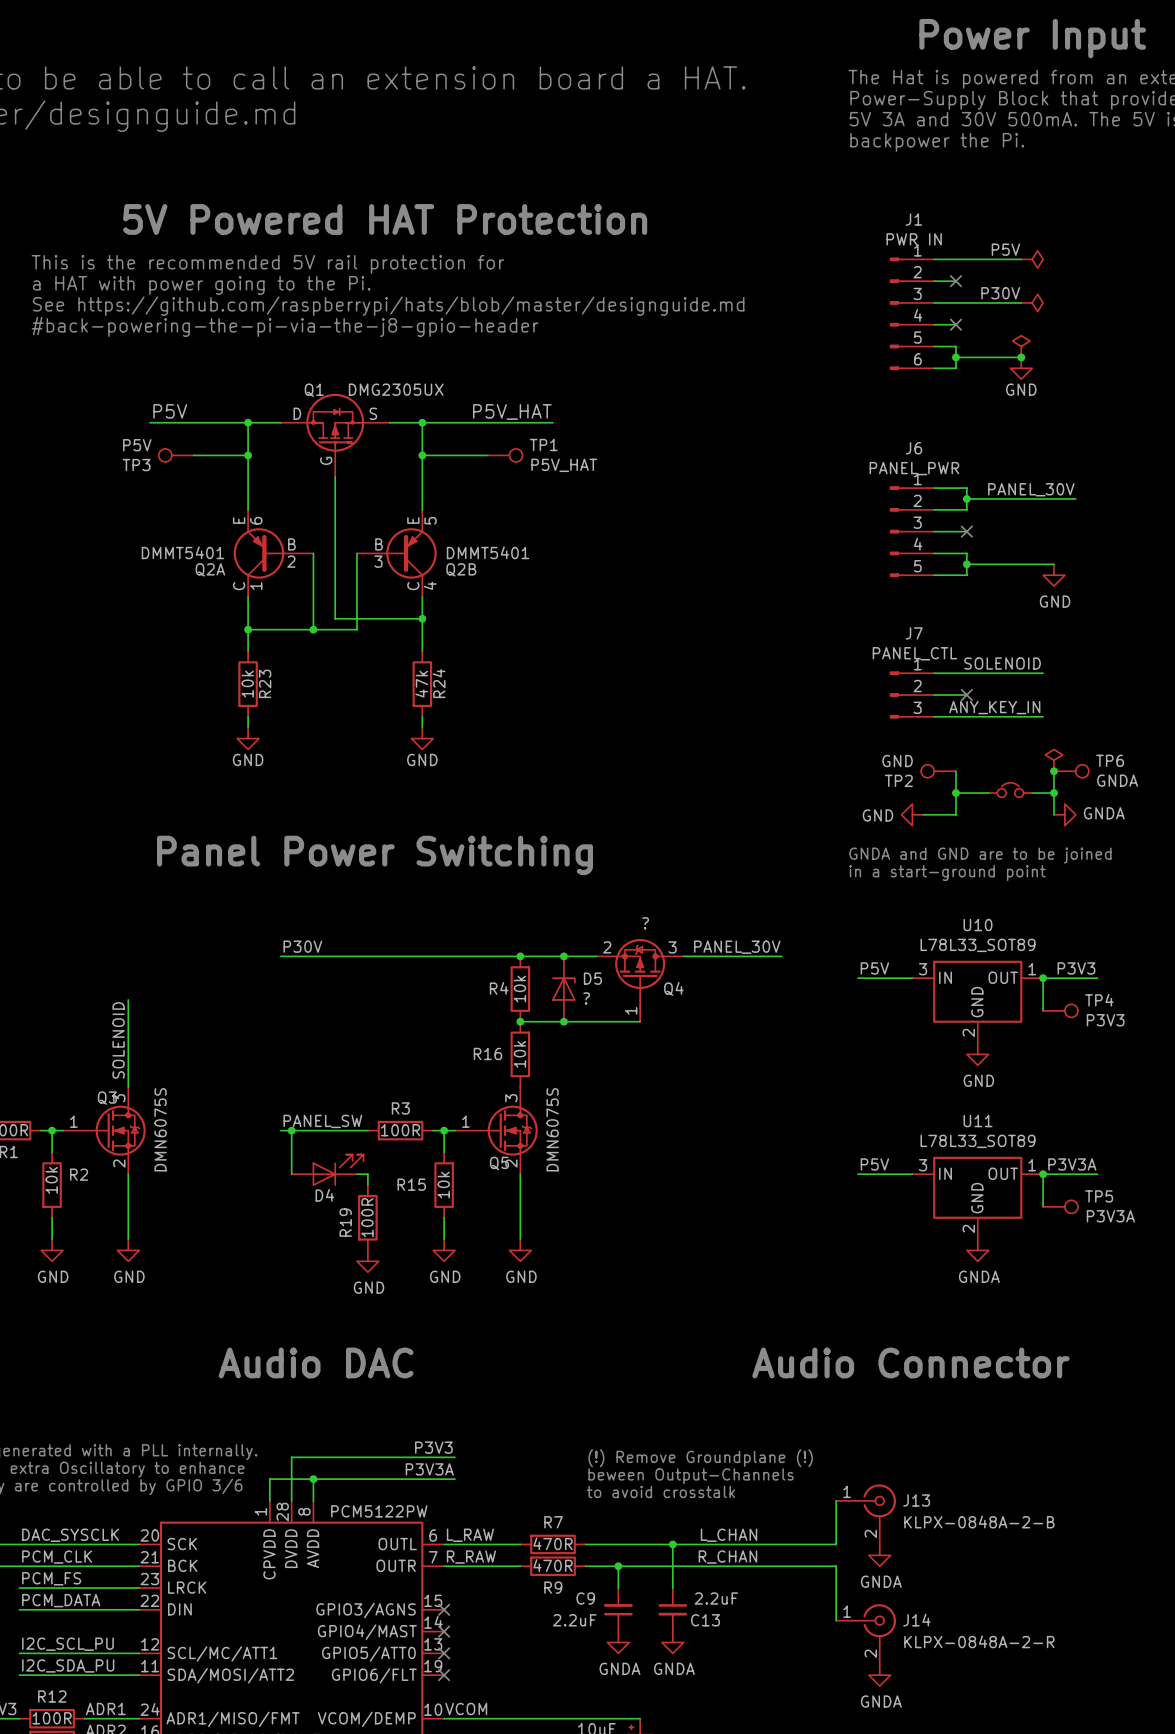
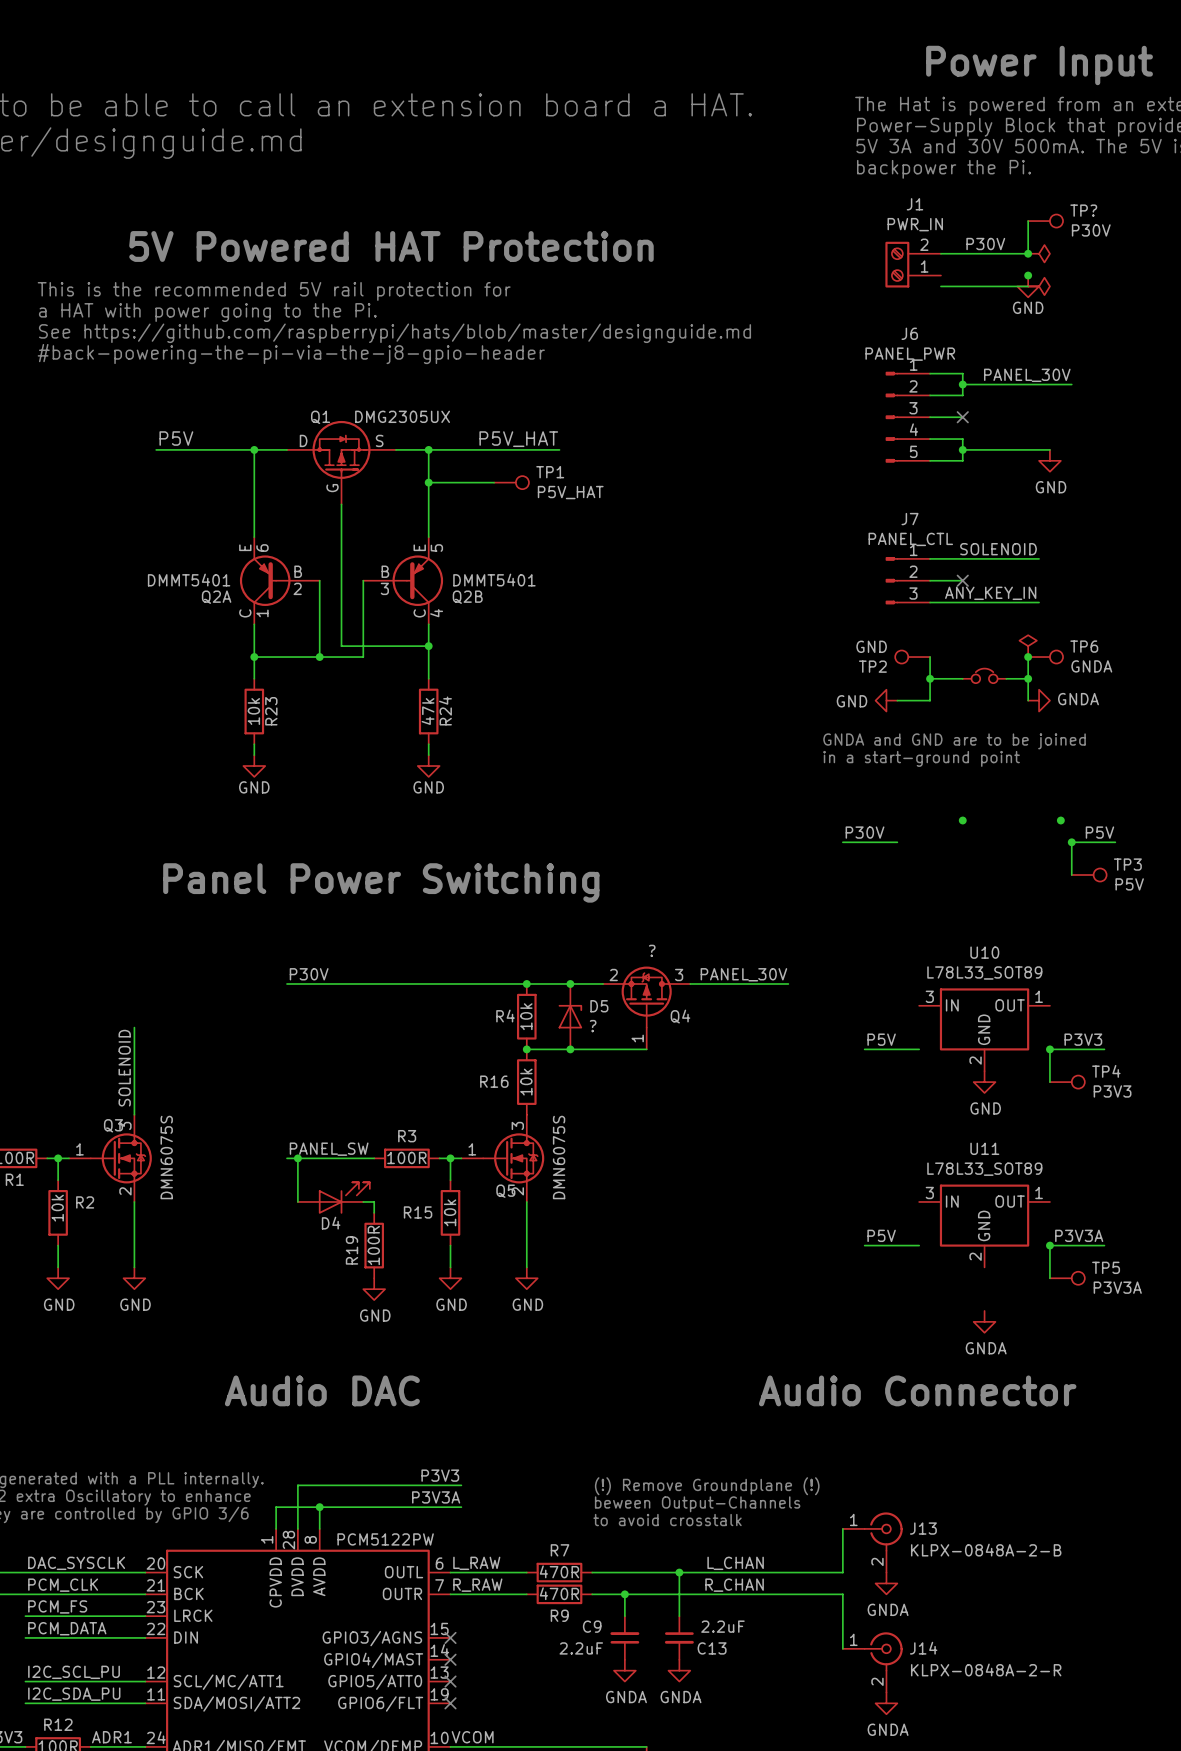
wire: none -> (1028, 221) (1028, 253) (940, 253)
TP?: none -> P30V (1045, 221)
J1 name position: J1 (913, 219) -> J1 (914, 204)
junction: none -> (1028, 253)
power symbol: none -> (1039, 253)
J1 value: PWR IN (914, 239) -> PWR_IN (915, 224)
junction: none -> (1028, 275)
label: P5V (1005, 249) -> none
J1 symbol: [889, 257, 935, 371] -> [885, 241, 941, 288]
power symbol: none -> GND (1028, 286)
wire: (934, 281) (955, 281) -> none
no-connect mark: (955, 281) -> none
label position: P30V (1000, 293) -> P30V (985, 244)
wire: (934, 302) (1021, 302) -> (962, 449) (1049, 449)
power symbol: (1032, 302) -> none
wire: (934, 324) (955, 324) -> none
no-connect mark: (955, 324) -> none
power symbol: (1021, 346) -> none
wire: none -> (1028, 384) (1071, 384)
junction: (1021, 357) -> none
power symbol: GND (1021, 368) -> none
wire: none -> (930, 417) (962, 417)
no-connect mark: none -> (962, 417)
junction: none -> (962, 449)
power symbol: none -> GND (1049, 460)
TP3 rotation: 0° (165, 455) -> 180° (1100, 875)
TP3 position: (176, 455) -> (1089, 875)
wire: (193, 455) (248, 455) -> none
junction: (248, 455) -> none
wire: (934, 488) (966, 488) (966, 509) (934, 509) -> (930, 439) (962, 439) (962, 460) (930, 460)
label position: PANEL_30V (1031, 489) -> PANEL_30V (1027, 375)
wire: (966, 498) (1075, 498) -> none
junction: (966, 498) -> none
J6 position: (912, 531) -> (907, 417)
wire: none -> (973, 558) (1039, 558)
no-connect mark position: (966, 531) -> (962, 580)
wire: (955, 553) (966, 553) (966, 575) -> (1039, 602) (973, 602)
wire: (966, 564) (1053, 564) -> none
junction: (966, 564) -> none
power symbol: GND (1053, 575) -> none
power symbol: none -> (1028, 646)
junction: none -> (1028, 657)
junction: none -> (930, 678)
junction: none -> (1028, 678)
label position: SOLENOID (1002, 663) -> SOLENOID (998, 549)
power symbol: none -> GND (886, 700)
wire: (934, 673) (1043, 673) -> none
J7 position: (912, 695) -> (907, 580)
wire: (934, 695) (966, 695) -> none
no-connect mark: (966, 695) -> none
label position: ANY_KEY_IN (994, 707) -> ANY_KEY_IN (990, 593)
wire: (934, 716) (1043, 716) -> none
power symbol: (1053, 760) -> none
TP2 position: (938, 771) -> (912, 657)
wire: (955, 771) (955, 814) (923, 814) -> (930, 657) (930, 700) (897, 700)
wire: (1053, 771) (1053, 814) -> (1028, 657) (1028, 700)
junction position: (1053, 771) -> (1071, 842)
TP6 position: (1071, 771) -> (1045, 657)
part position: (1010, 790) -> (984, 675)
wire: (955, 793) (988, 793) -> (930, 678) (962, 678)
wire: (1032, 793) (1053, 793) -> (1006, 678) (1028, 678)
label: none -> P30V (865, 832)
label: none -> P5V (1099, 832)
wire: none -> (842, 842) (897, 842)
power symbol: GND (912, 814) -> none
power symbol position: GNDA (1064, 814) -> GNDA (1039, 700)
wire: none -> (1115, 842) (1071, 842) (1071, 875)
text position: GNDA and GND are to be joined (980, 855) -> GNDA and GND are to be joined (954, 741)
text position: in a start-ground point (947, 873) -> in a start-ground point (921, 758)
label position: P5V (874, 968) -> P5V (881, 1039)
label position: P3V3 (1076, 968) -> P3V3 (1083, 1039)
wire: (857, 978) (912, 978) -> (864, 1049) (919, 1049)
junction position: (1043, 978) -> (1049, 1049)
wire: (1097, 978) (1043, 978) (1043, 1010) -> (1104, 1049) (1049, 1049) (1049, 1082)
TP4 position: (1060, 1010) -> (1067, 1082)
label position: P5V (874, 1164) -> P5V (881, 1235)
label position: P3V3A (1072, 1164) -> P3V3A (1079, 1235)
wire: (857, 1174) (912, 1174) -> (864, 1245) (919, 1245)
junction position: (1043, 1174) -> (1049, 1245)
wire: (1097, 1174) (1043, 1174) (1043, 1206) -> (1104, 1245) (1049, 1245) (1049, 1278)
TP5 position: (1060, 1206) -> (1067, 1278)
power symbol position: GNDA (977, 1250) -> GNDA (984, 1321)

